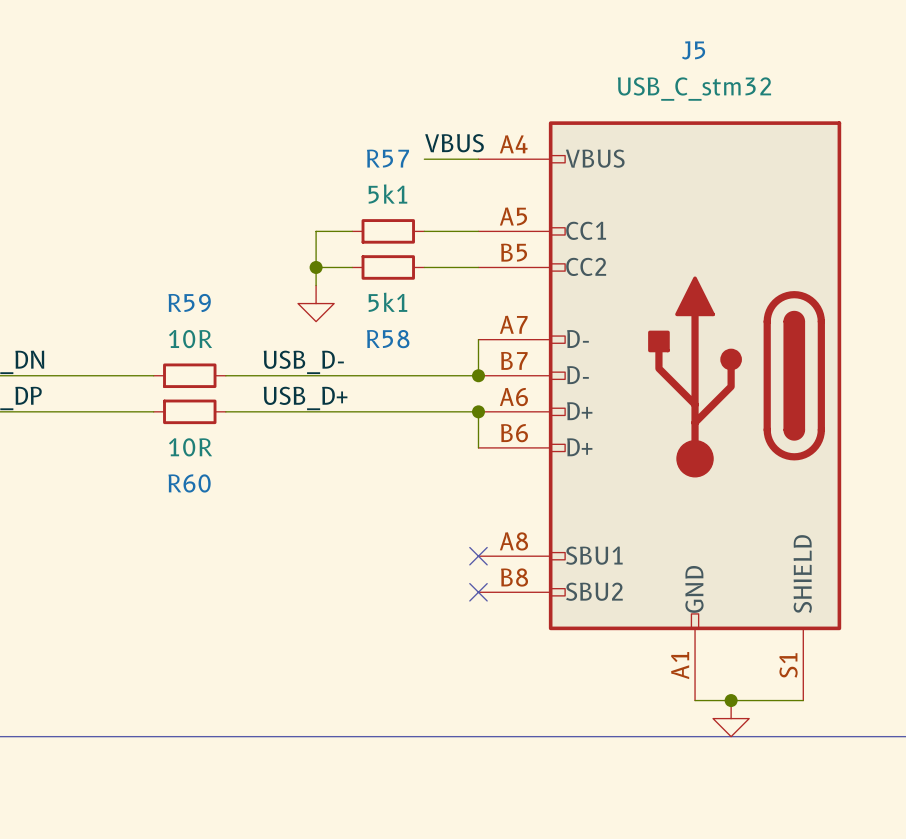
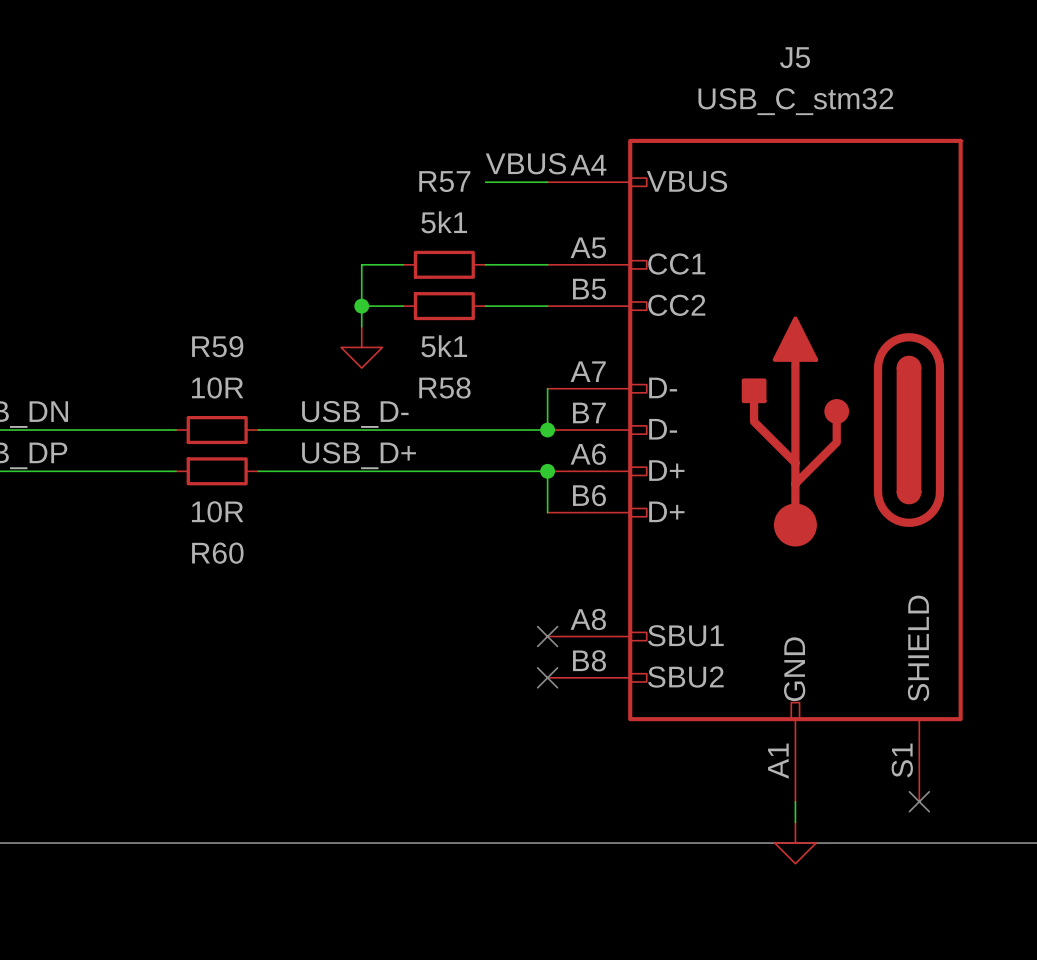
wire: (695, 700) (803, 700) -> (795, 801) (795, 822)
junction: (731, 700) -> none
no-connect mark: none -> (919, 801)
power symbol position: (731, 718) -> (795, 843)

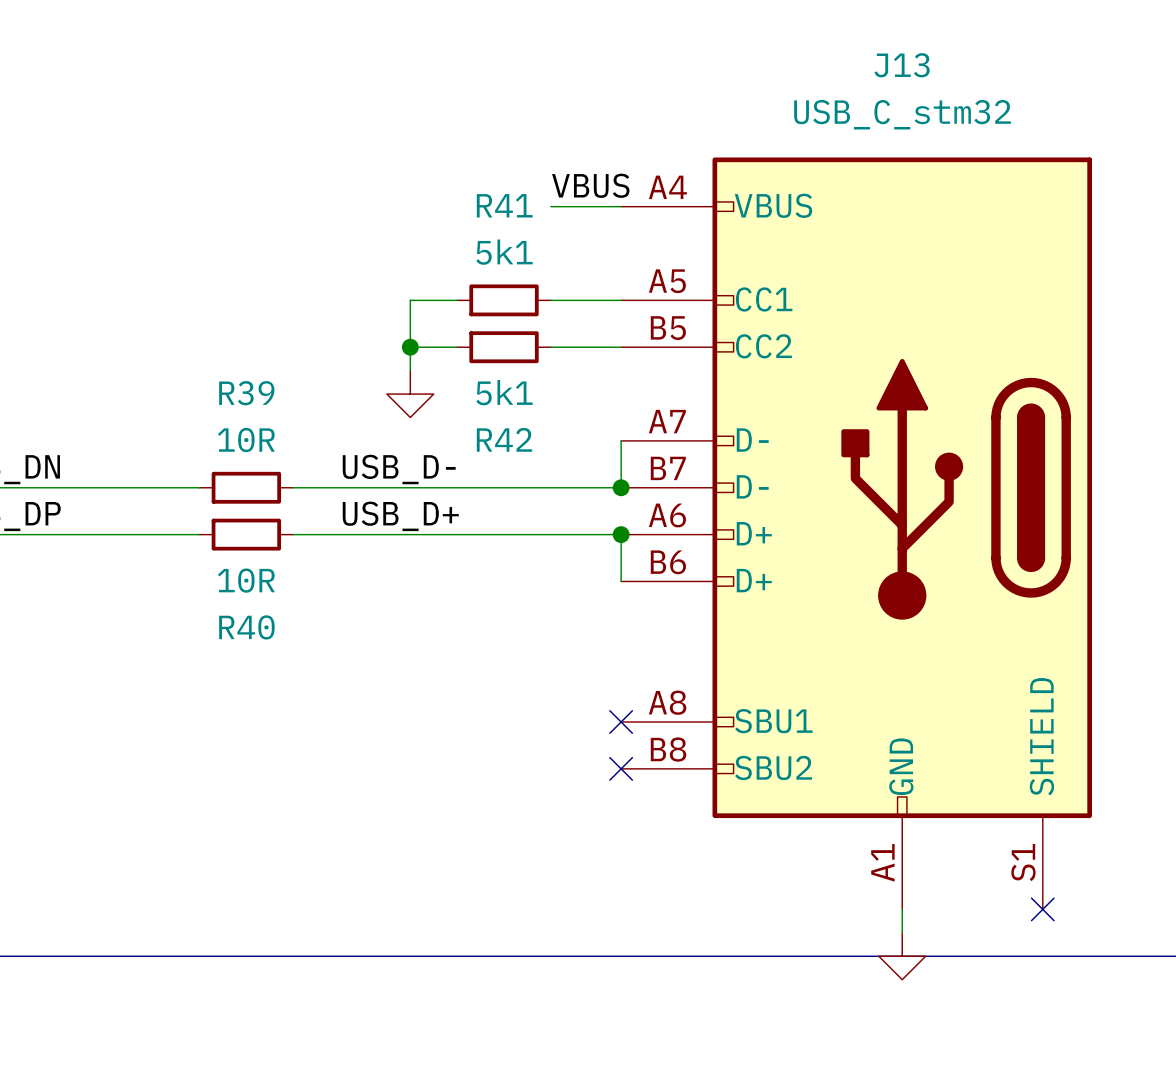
J5 name: J5 (795, 57) -> J13 (902, 65)
R57 name: R57 (444, 181) -> R41 (504, 205)
R59 name: R59 (217, 346) -> R39 (246, 393)
R58 name: R58 (444, 387) -> R42 (504, 439)
R60 name: R60 (217, 553) -> R40 (246, 627)

